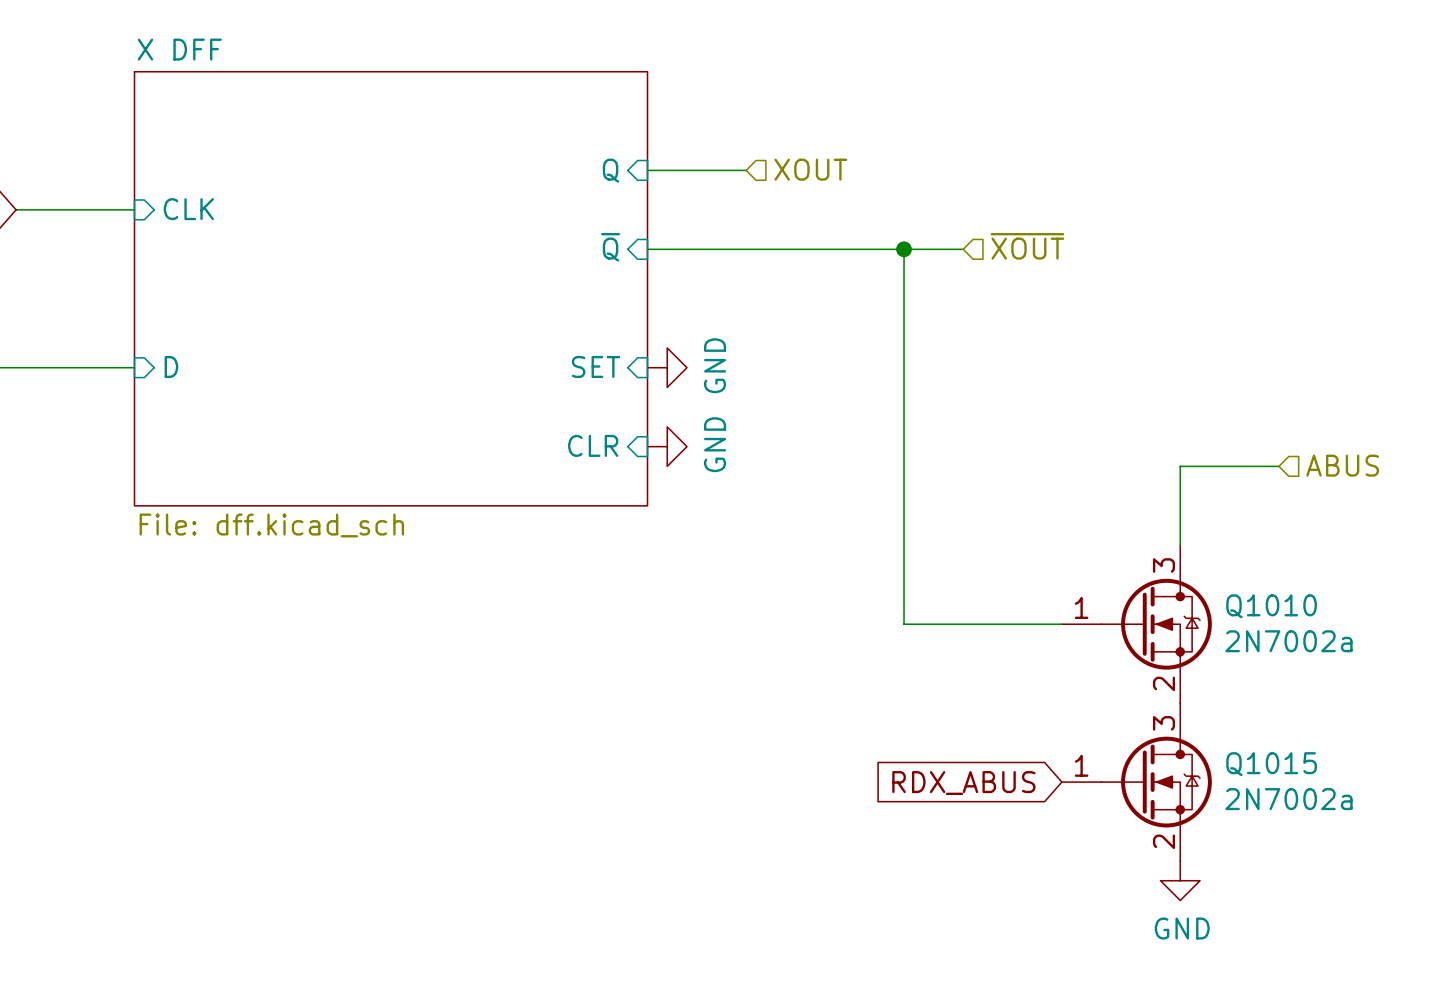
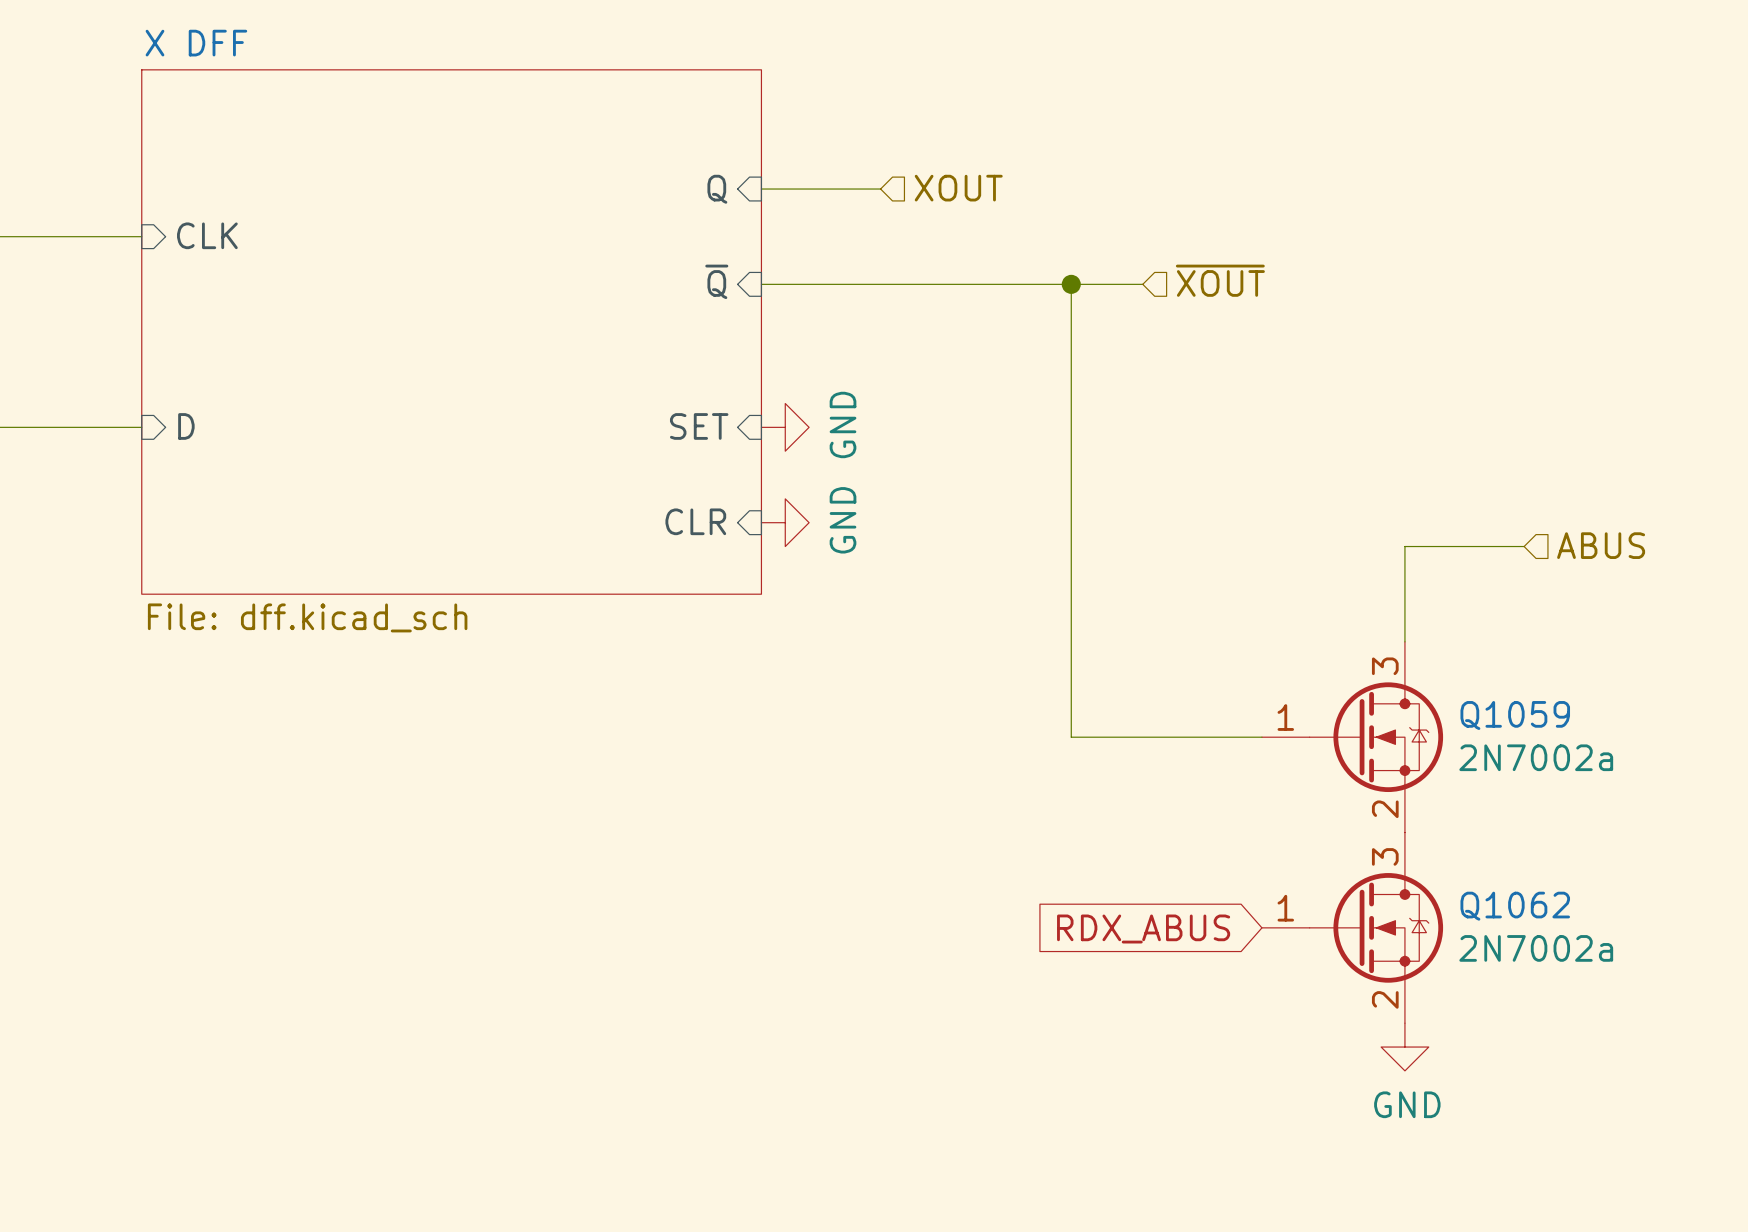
Q1010 name: Q1010 (1271, 606) -> Q1059 (1515, 715)
Q1015 name: Q1015 (1271, 764) -> Q1062 (1515, 906)

